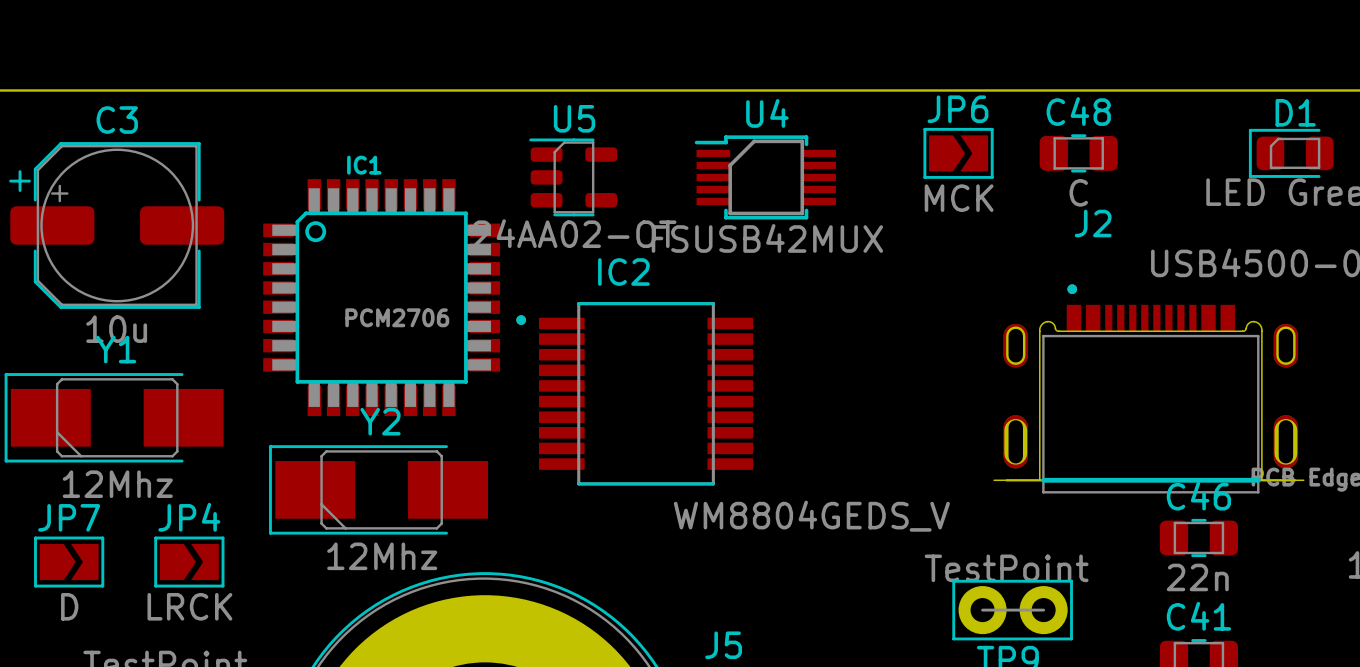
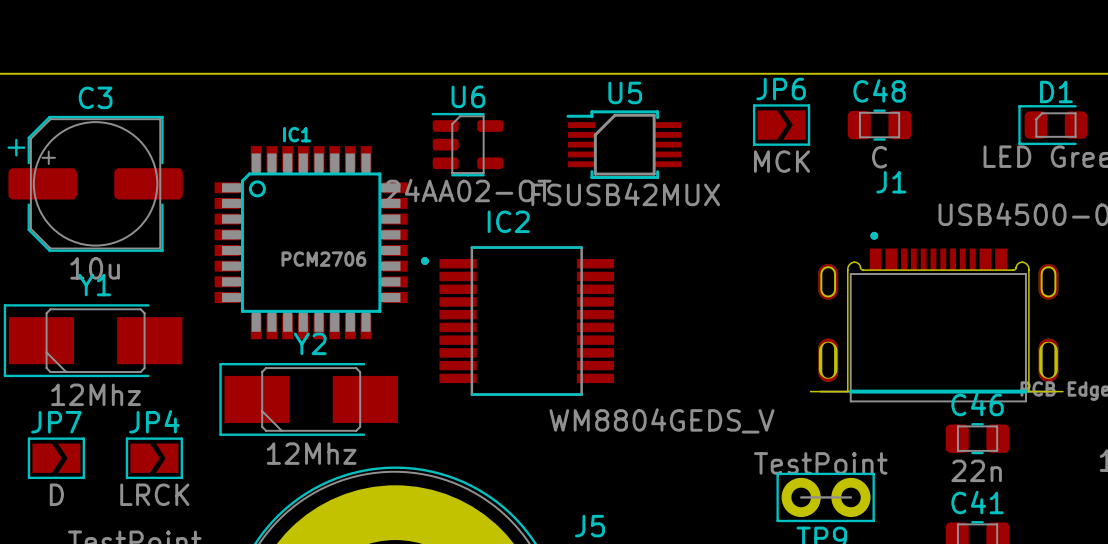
U4 name: U4 (767, 113) -> U5 (625, 92)
U5 name: U5 (574, 118) -> U6 (468, 96)
J2 name: J2 (1093, 223) -> J1 (891, 182)

